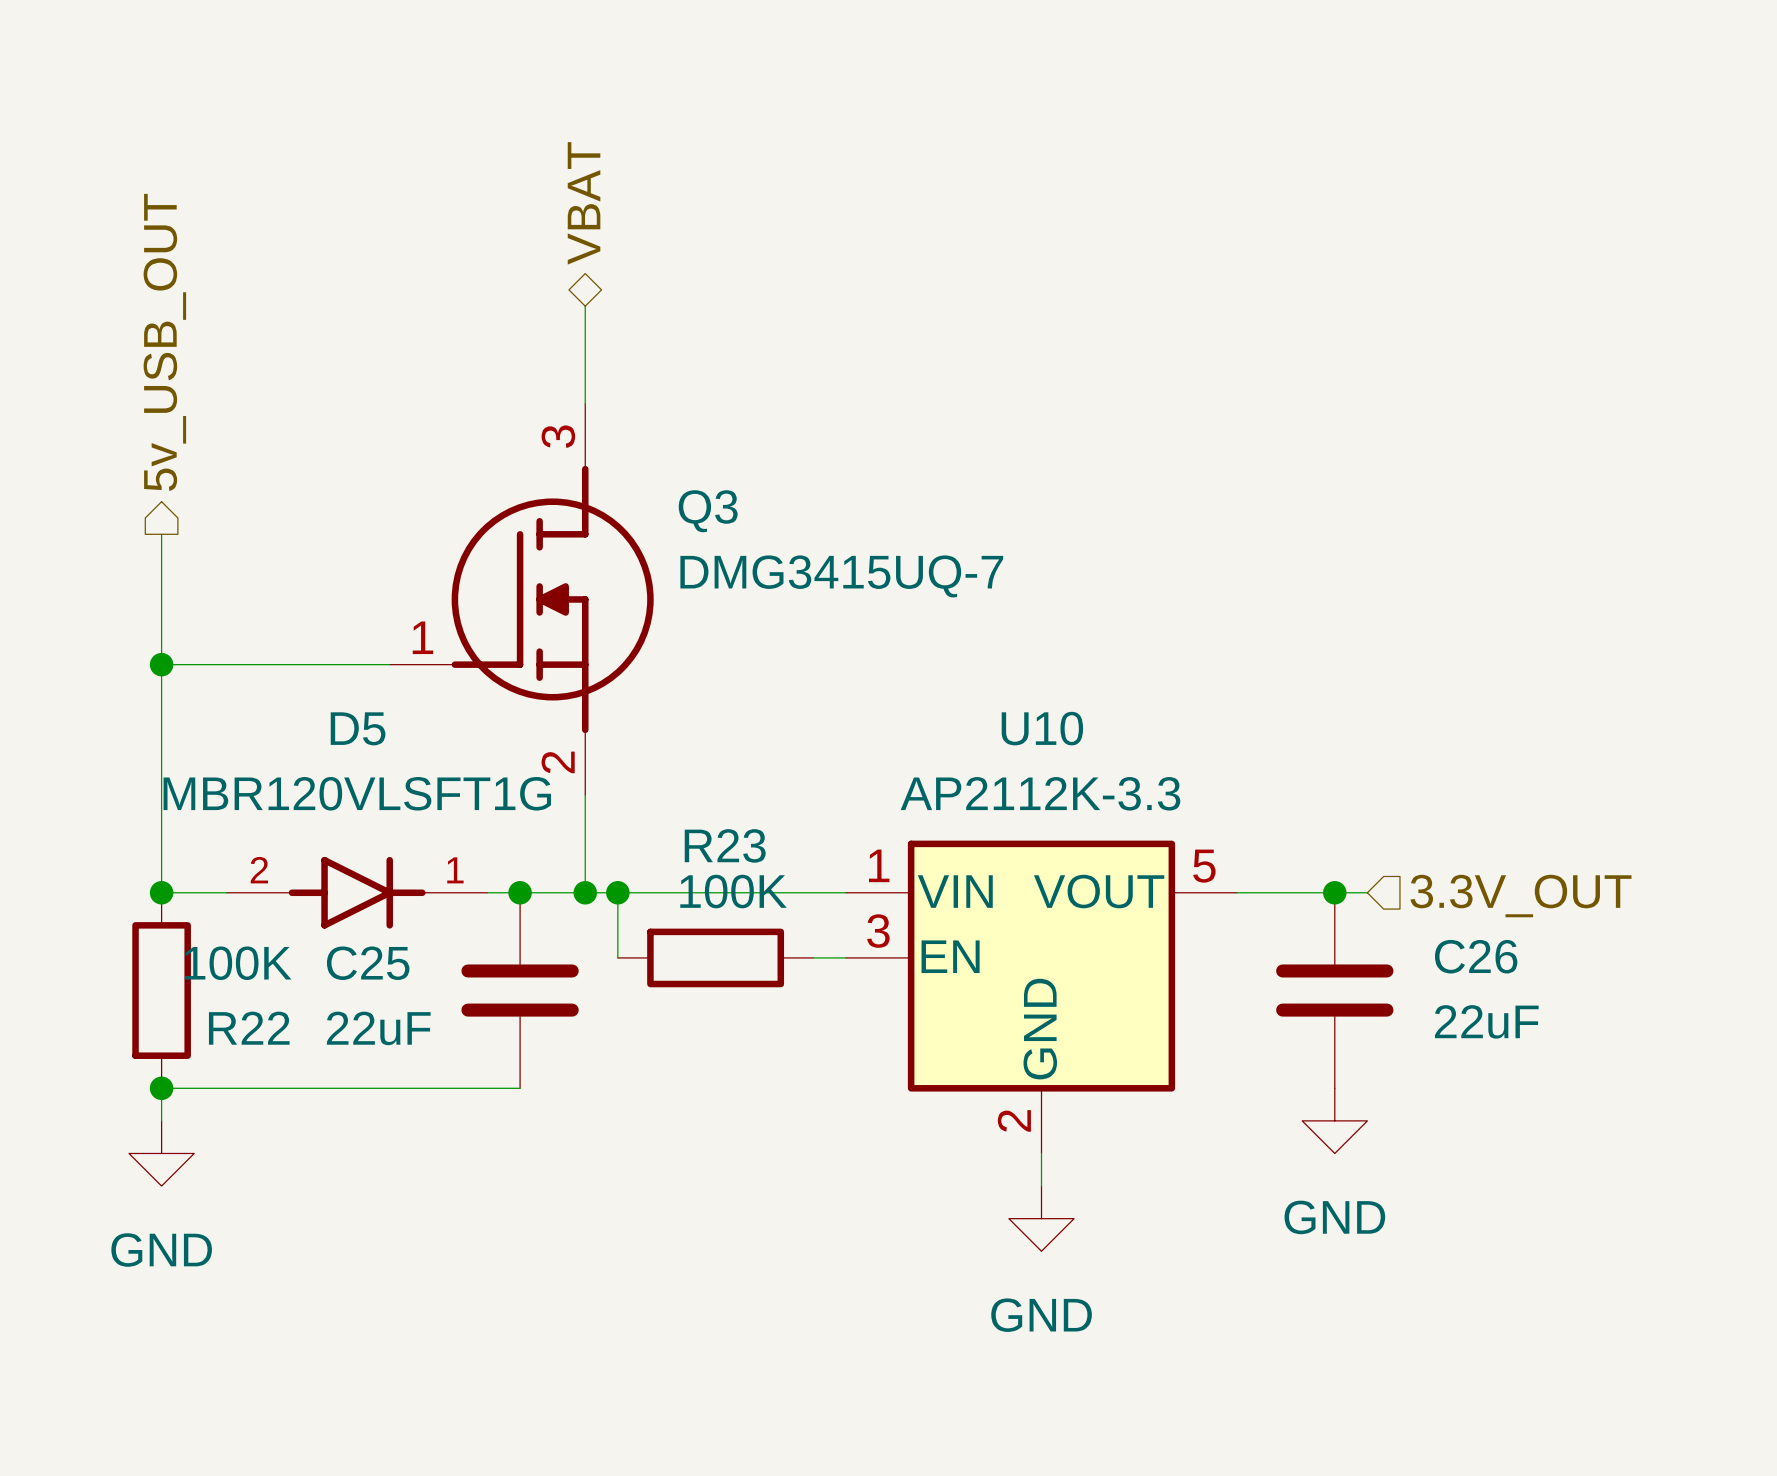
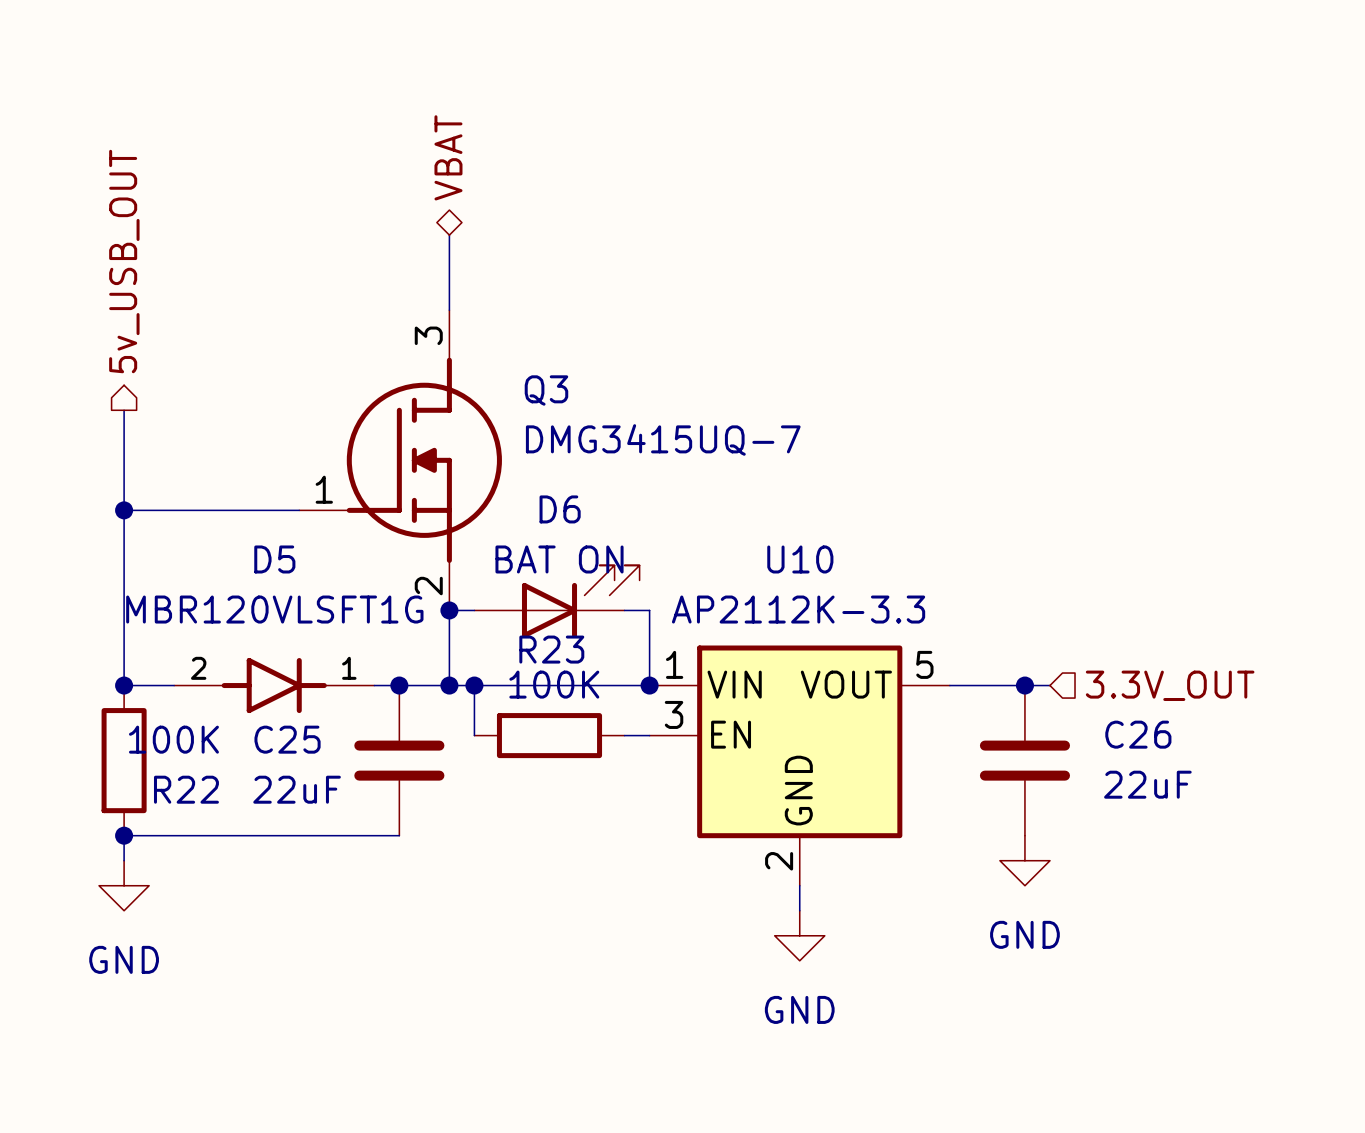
D6: none -> BAT ON (557, 601)
wire: none -> (449, 610) (474, 610)
junction: none -> (449, 610)
wire: none -> (624, 610) (649, 610) (649, 685)
junction: none -> (649, 685)

